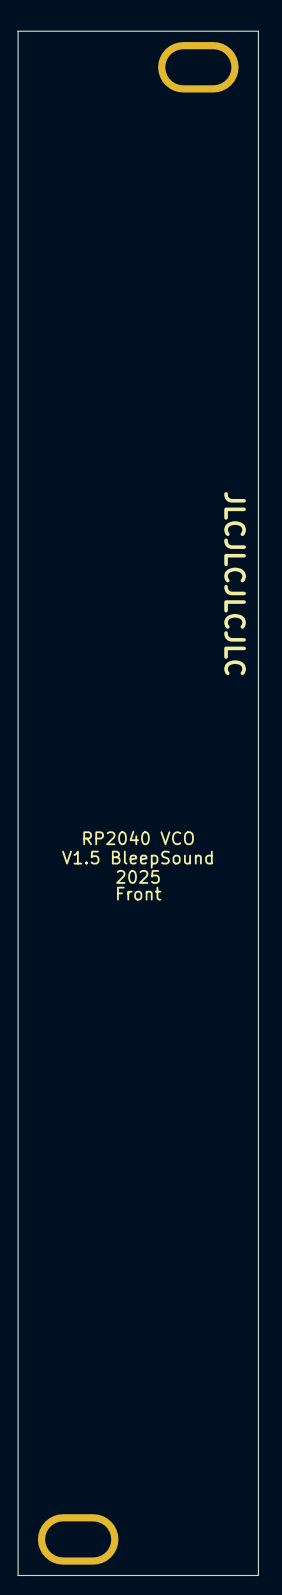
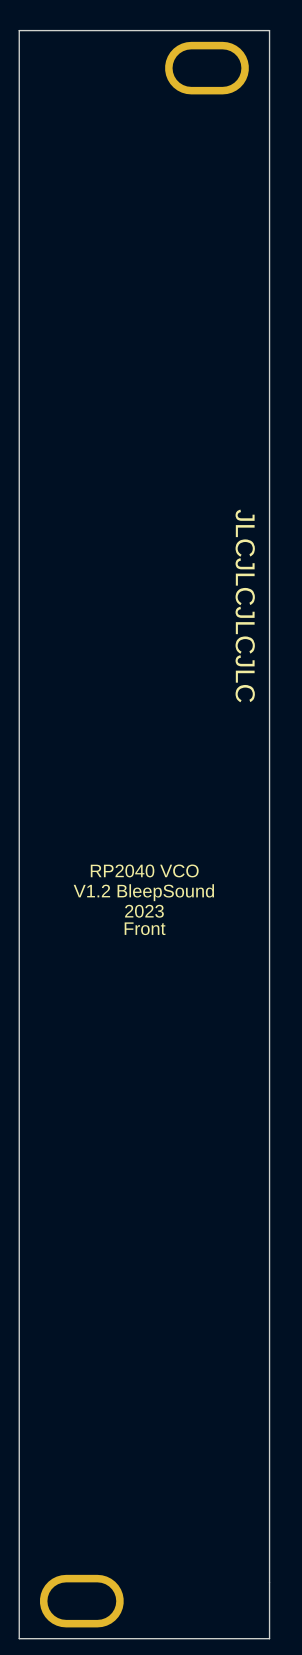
text: V1.5 BleepSound (137, 859) -> V1.2 BleepSound (143, 892)
text: 2025 (137, 876) -> 2023 (144, 911)

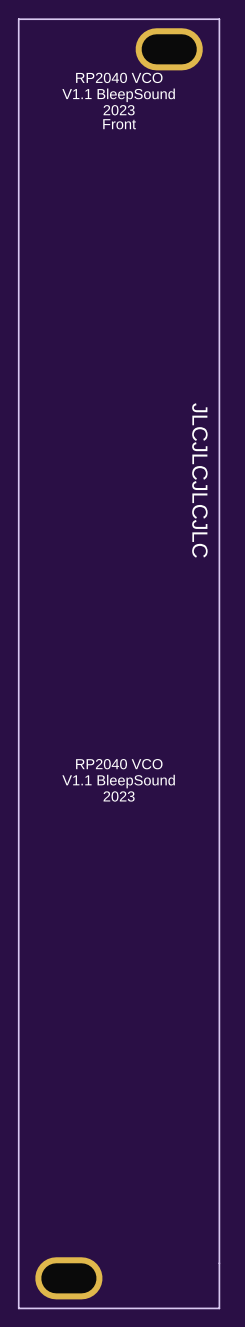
text: none -> RP2040 VCO (119, 77)
text: none -> V1.1 BleepSound (118, 95)
text: none -> 2023 (119, 110)
text: none -> Front (119, 124)
text position: RP2040 VCO (144, 870) -> RP2040 VCO (119, 764)
text: V1.2 BleepSound (143, 892) -> none
text position: 2023 (144, 911) -> 2023 (119, 796)
text: Front (145, 928) -> none
text: none -> V1.1 BleepSound (118, 781)

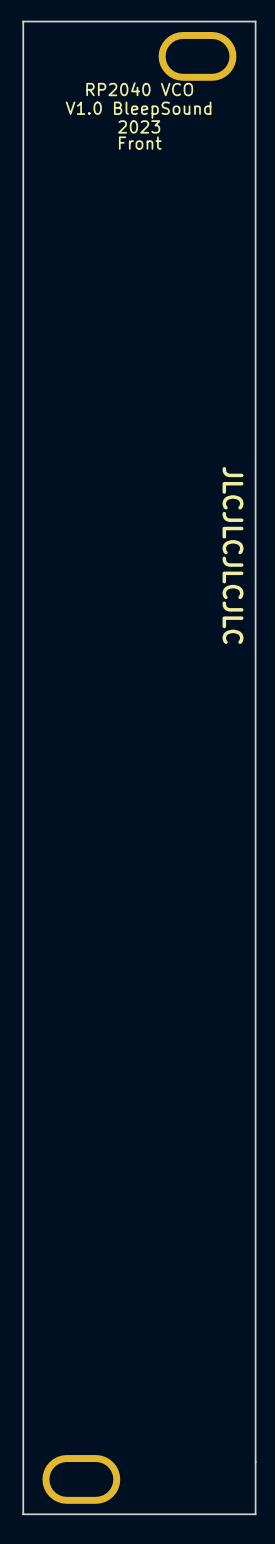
text: V1.1 BleepSound (118, 95) -> V1.0 BleepSound (138, 110)
text: RP2040 VCO (119, 764) -> none
text: V1.1 BleepSound (118, 781) -> none
text: 2023 (119, 796) -> none

